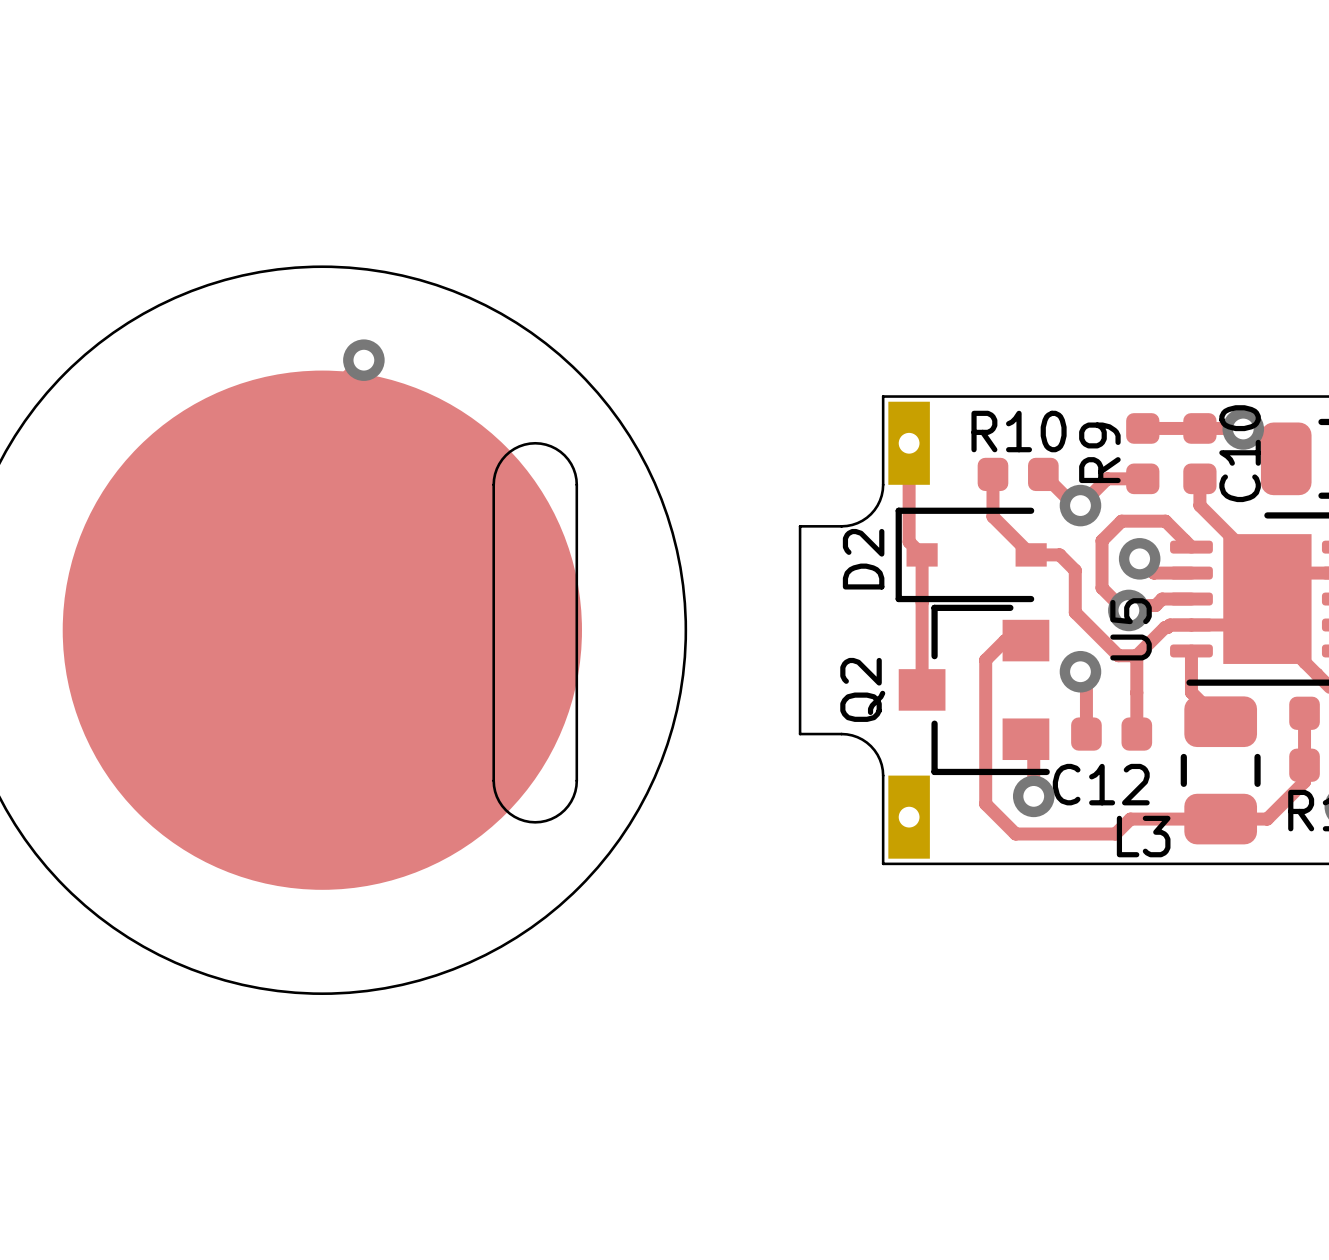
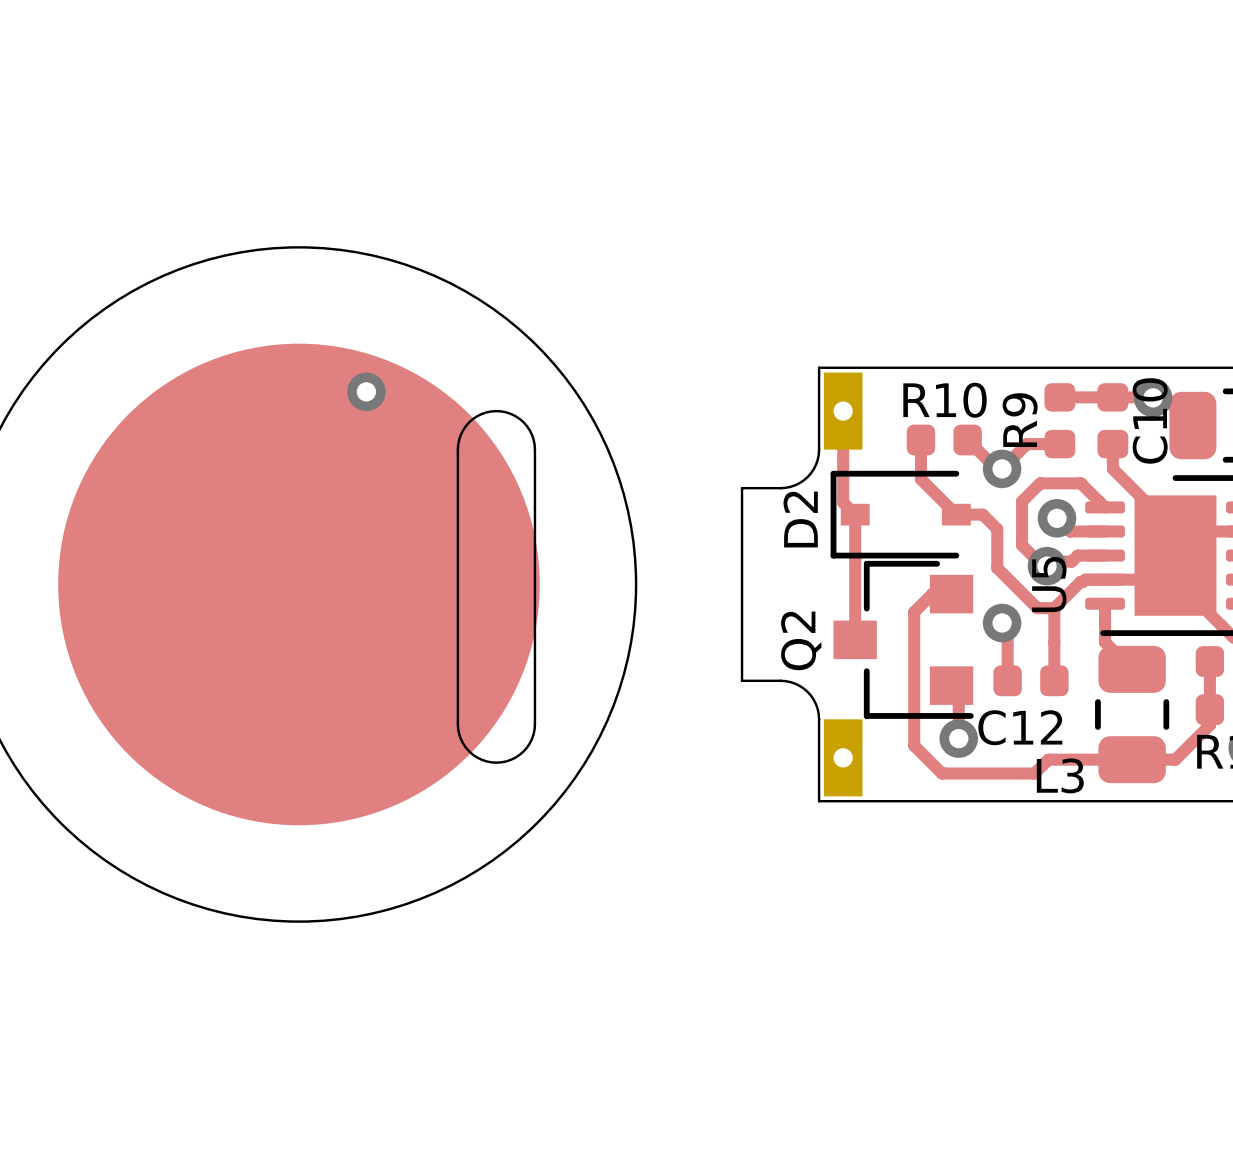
via position: (363, 360) -> (366, 391)

